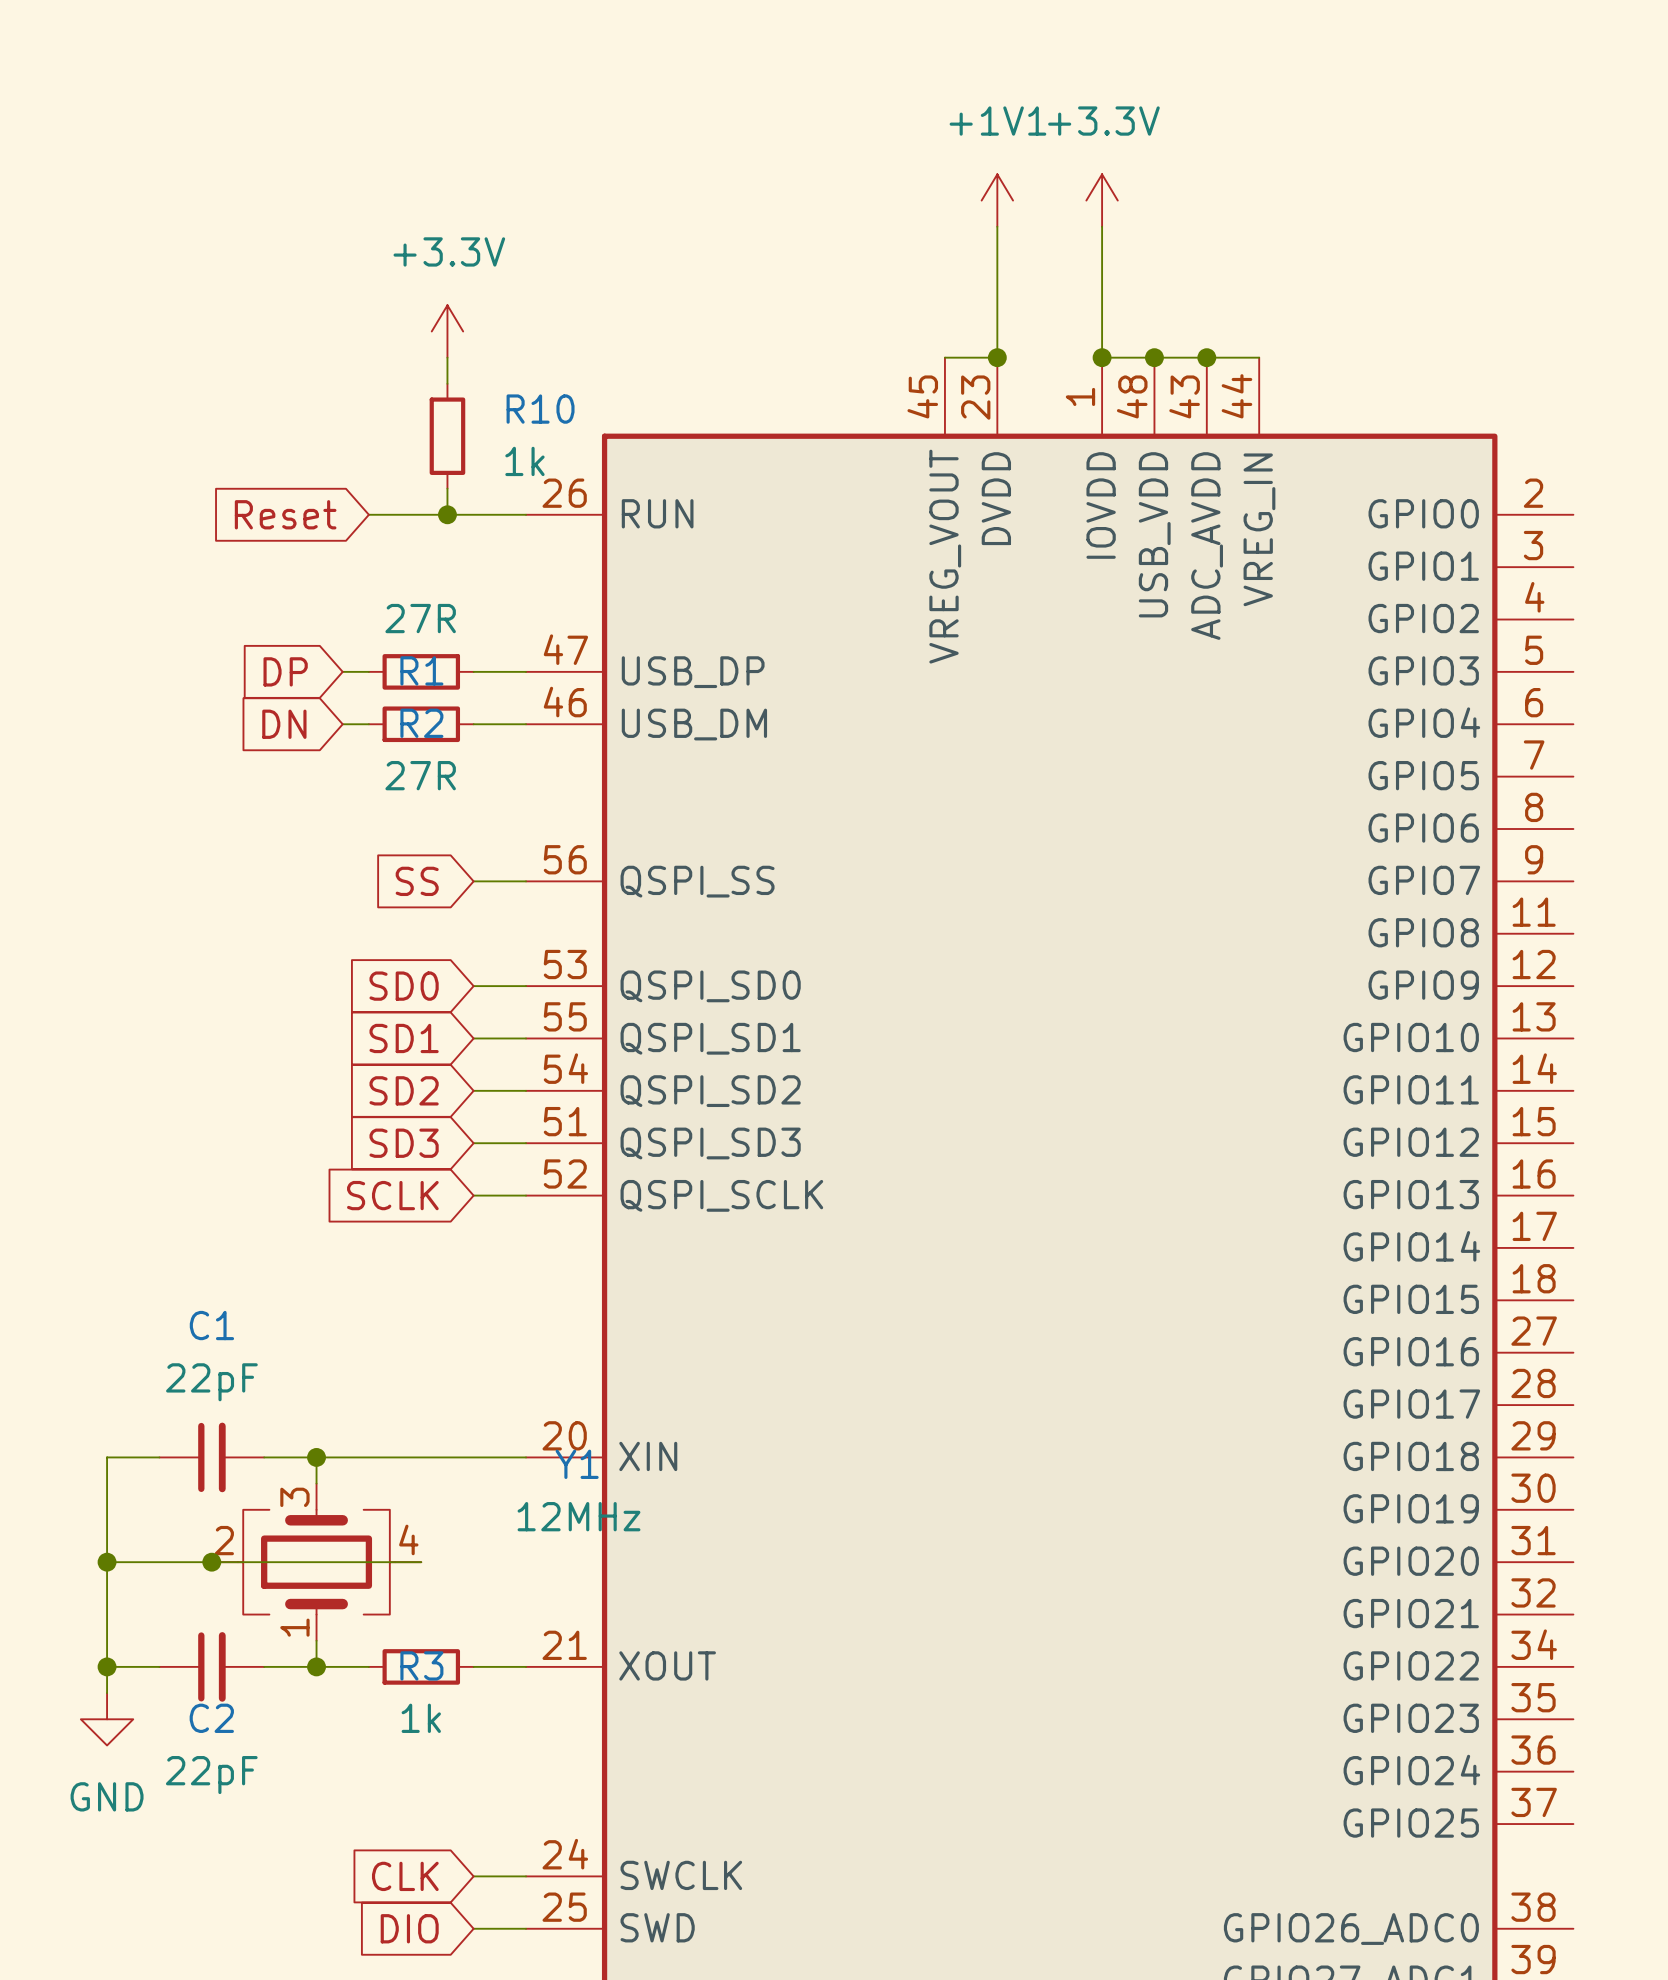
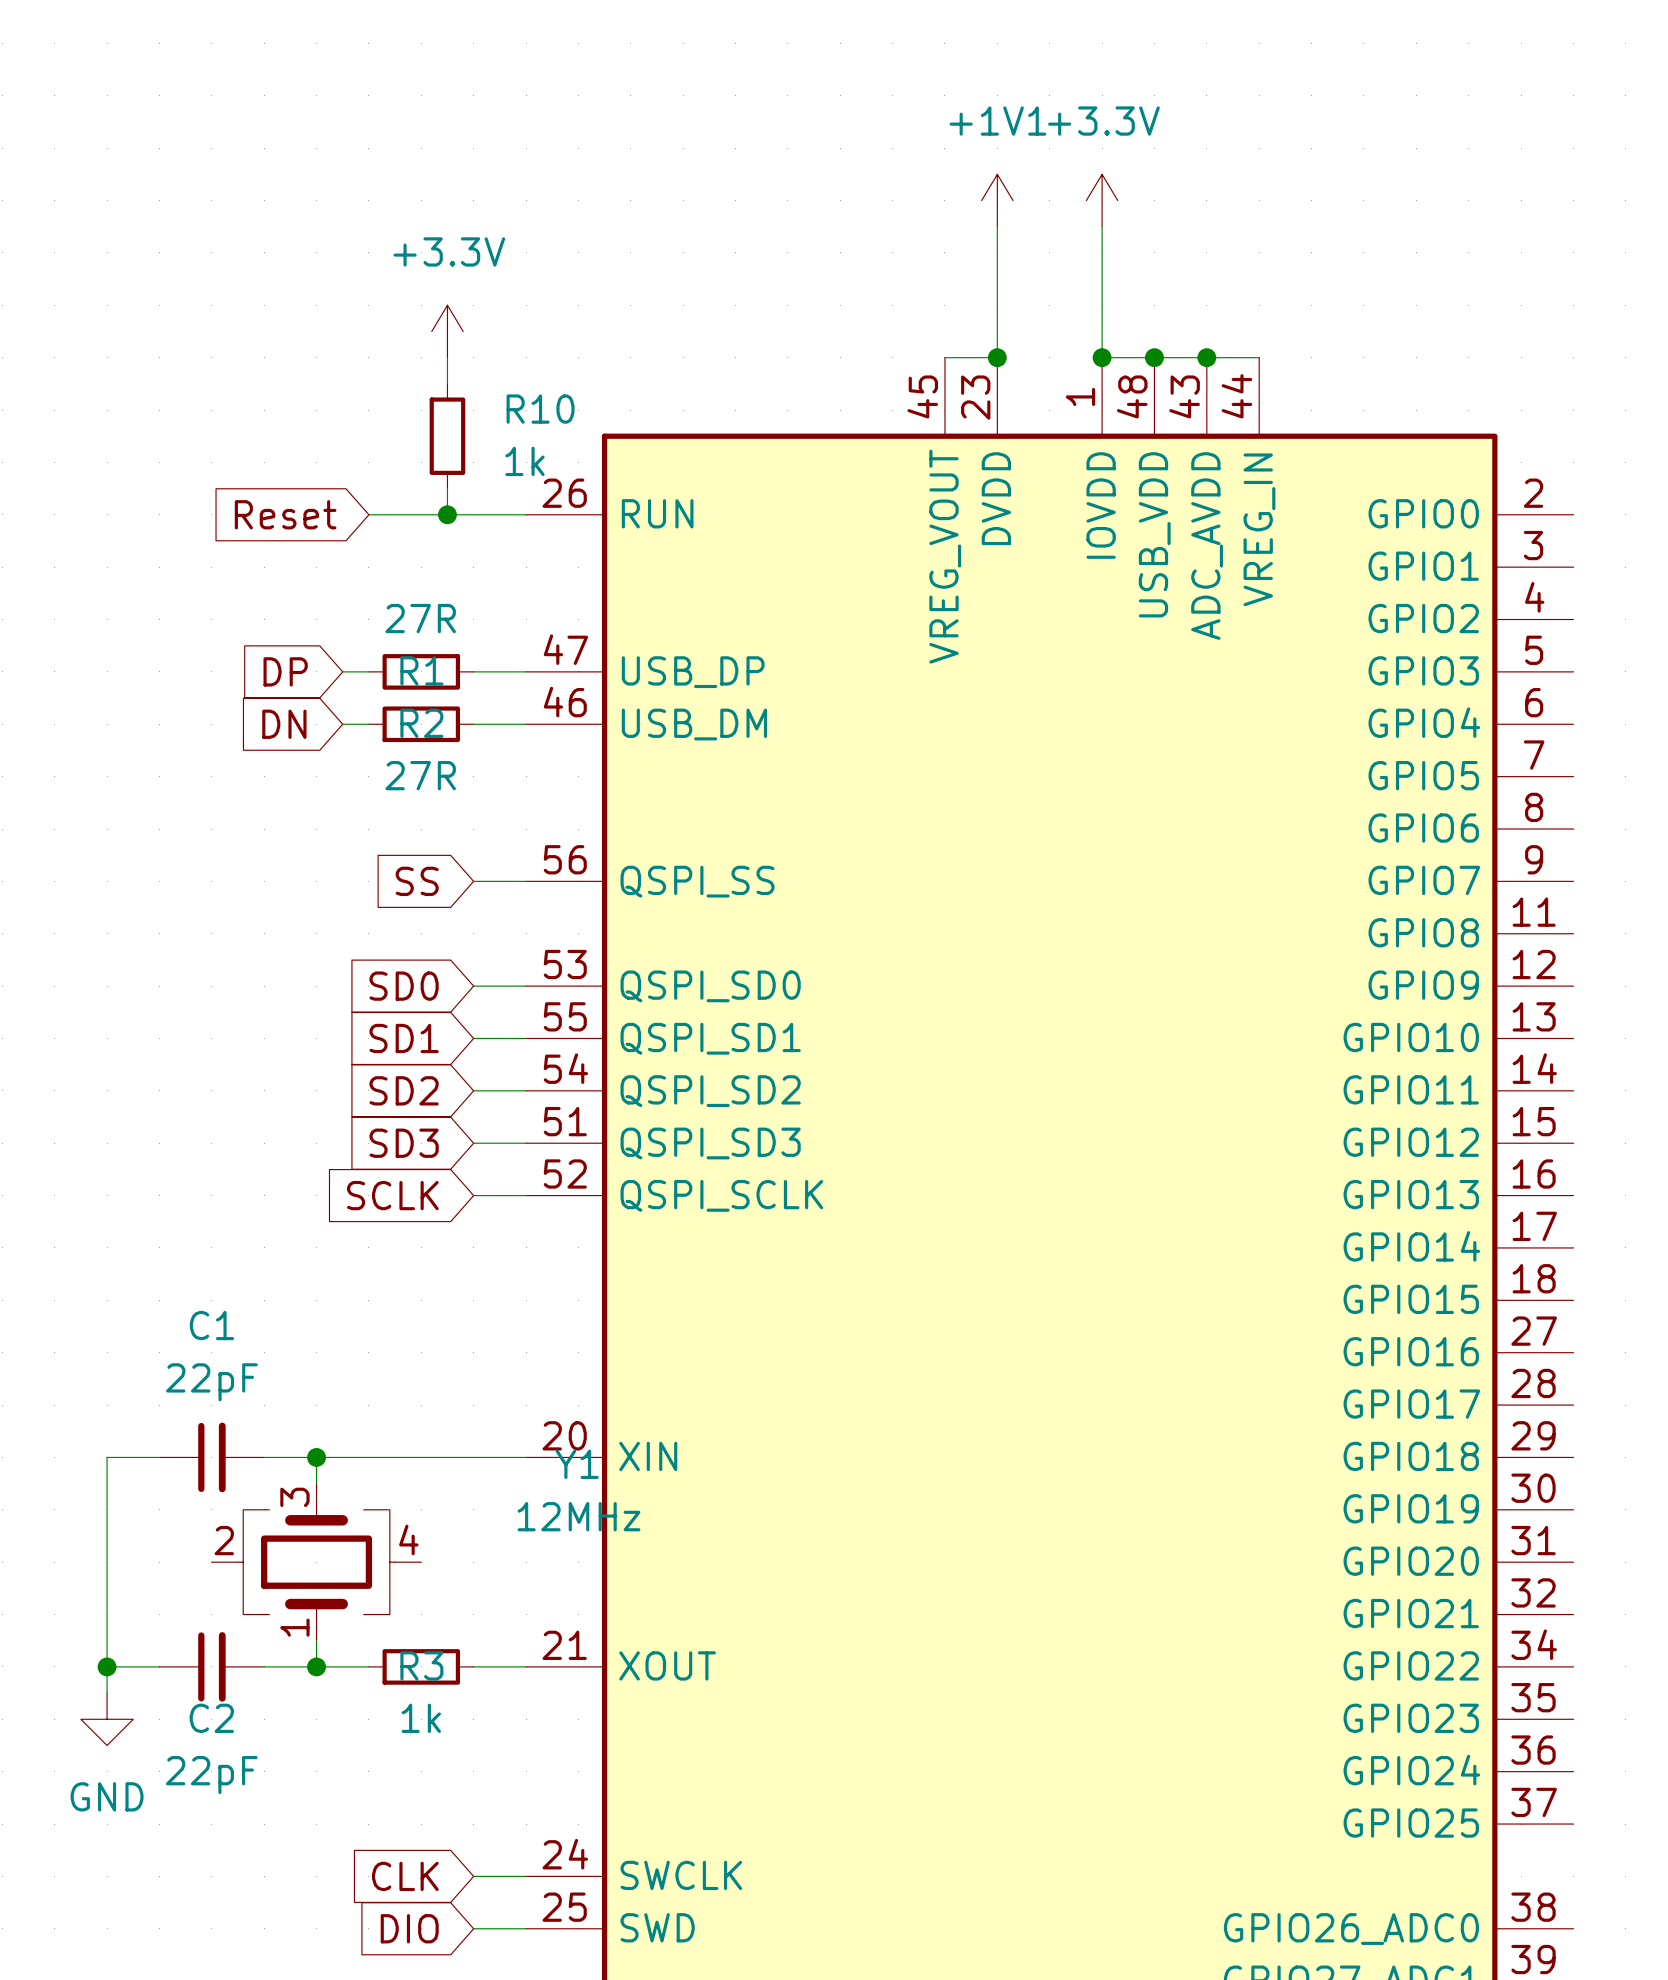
wire: (107, 1562) (421, 1562) -> none
junction: (107, 1562) -> none
junction: (211, 1562) -> none

